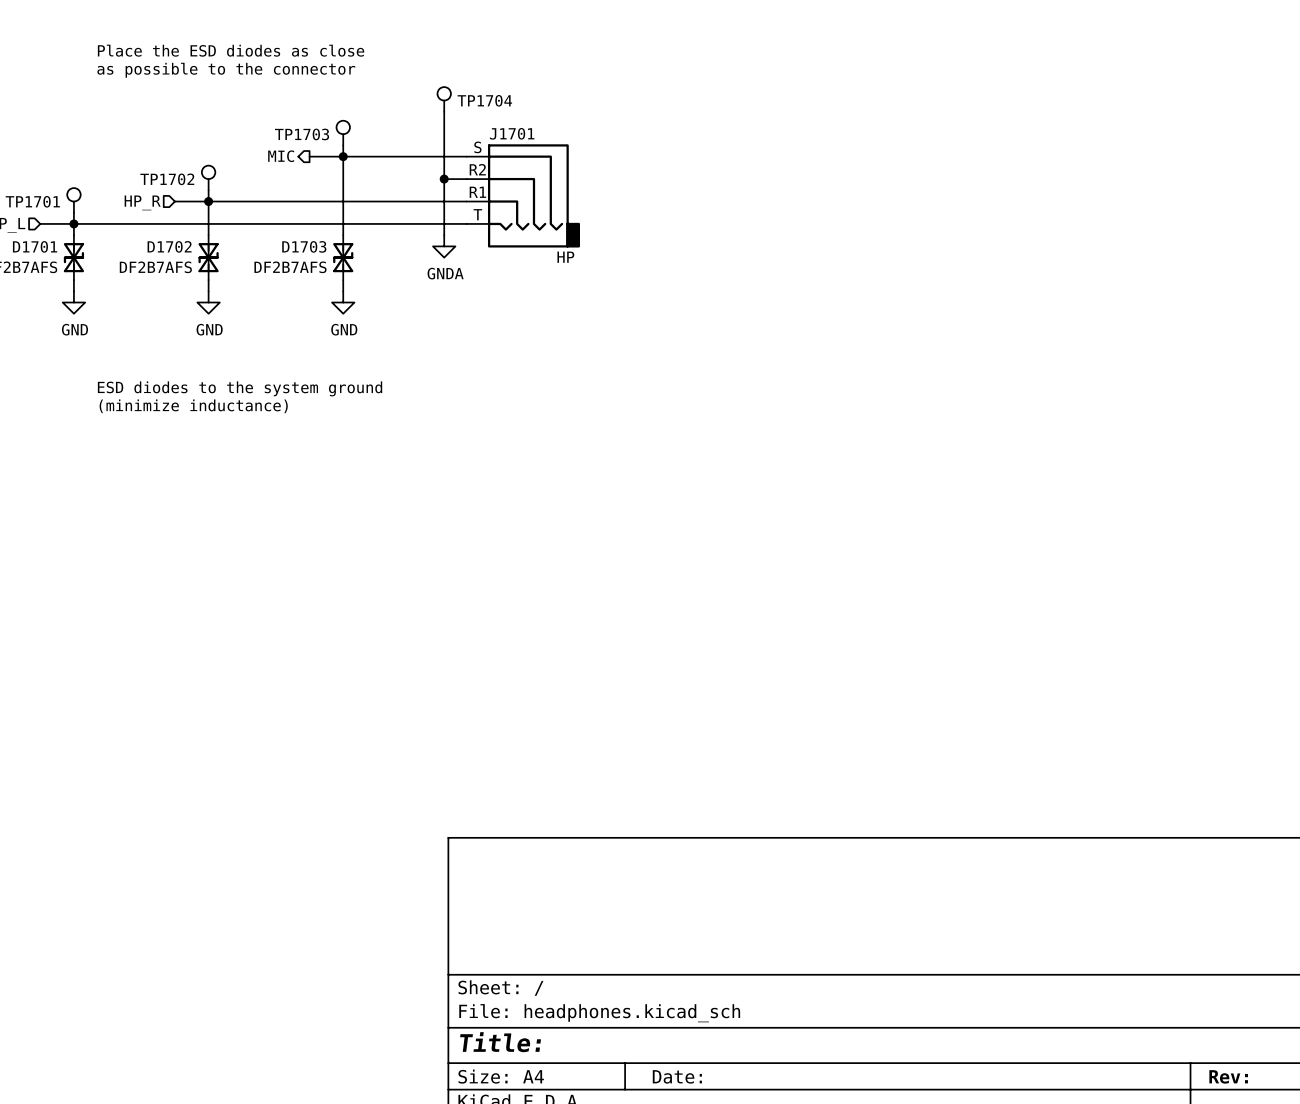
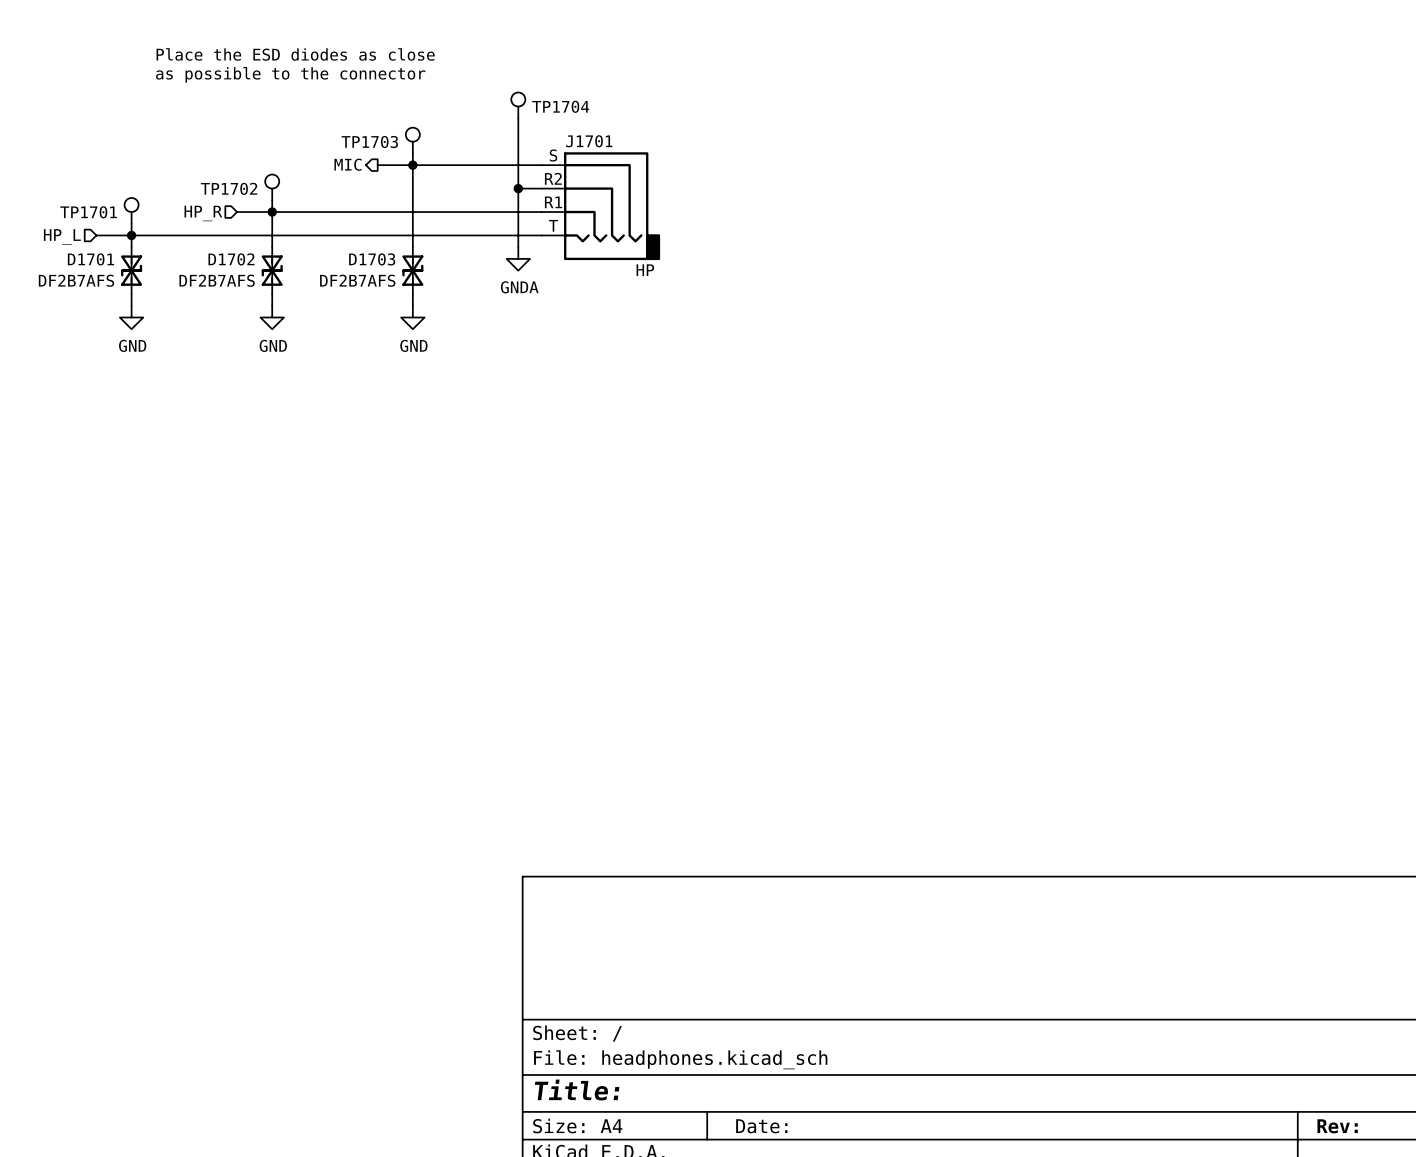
text: ESD diodes to the system ground (240, 388) -> none
text: (minimize inductance) (193, 406) -> none

